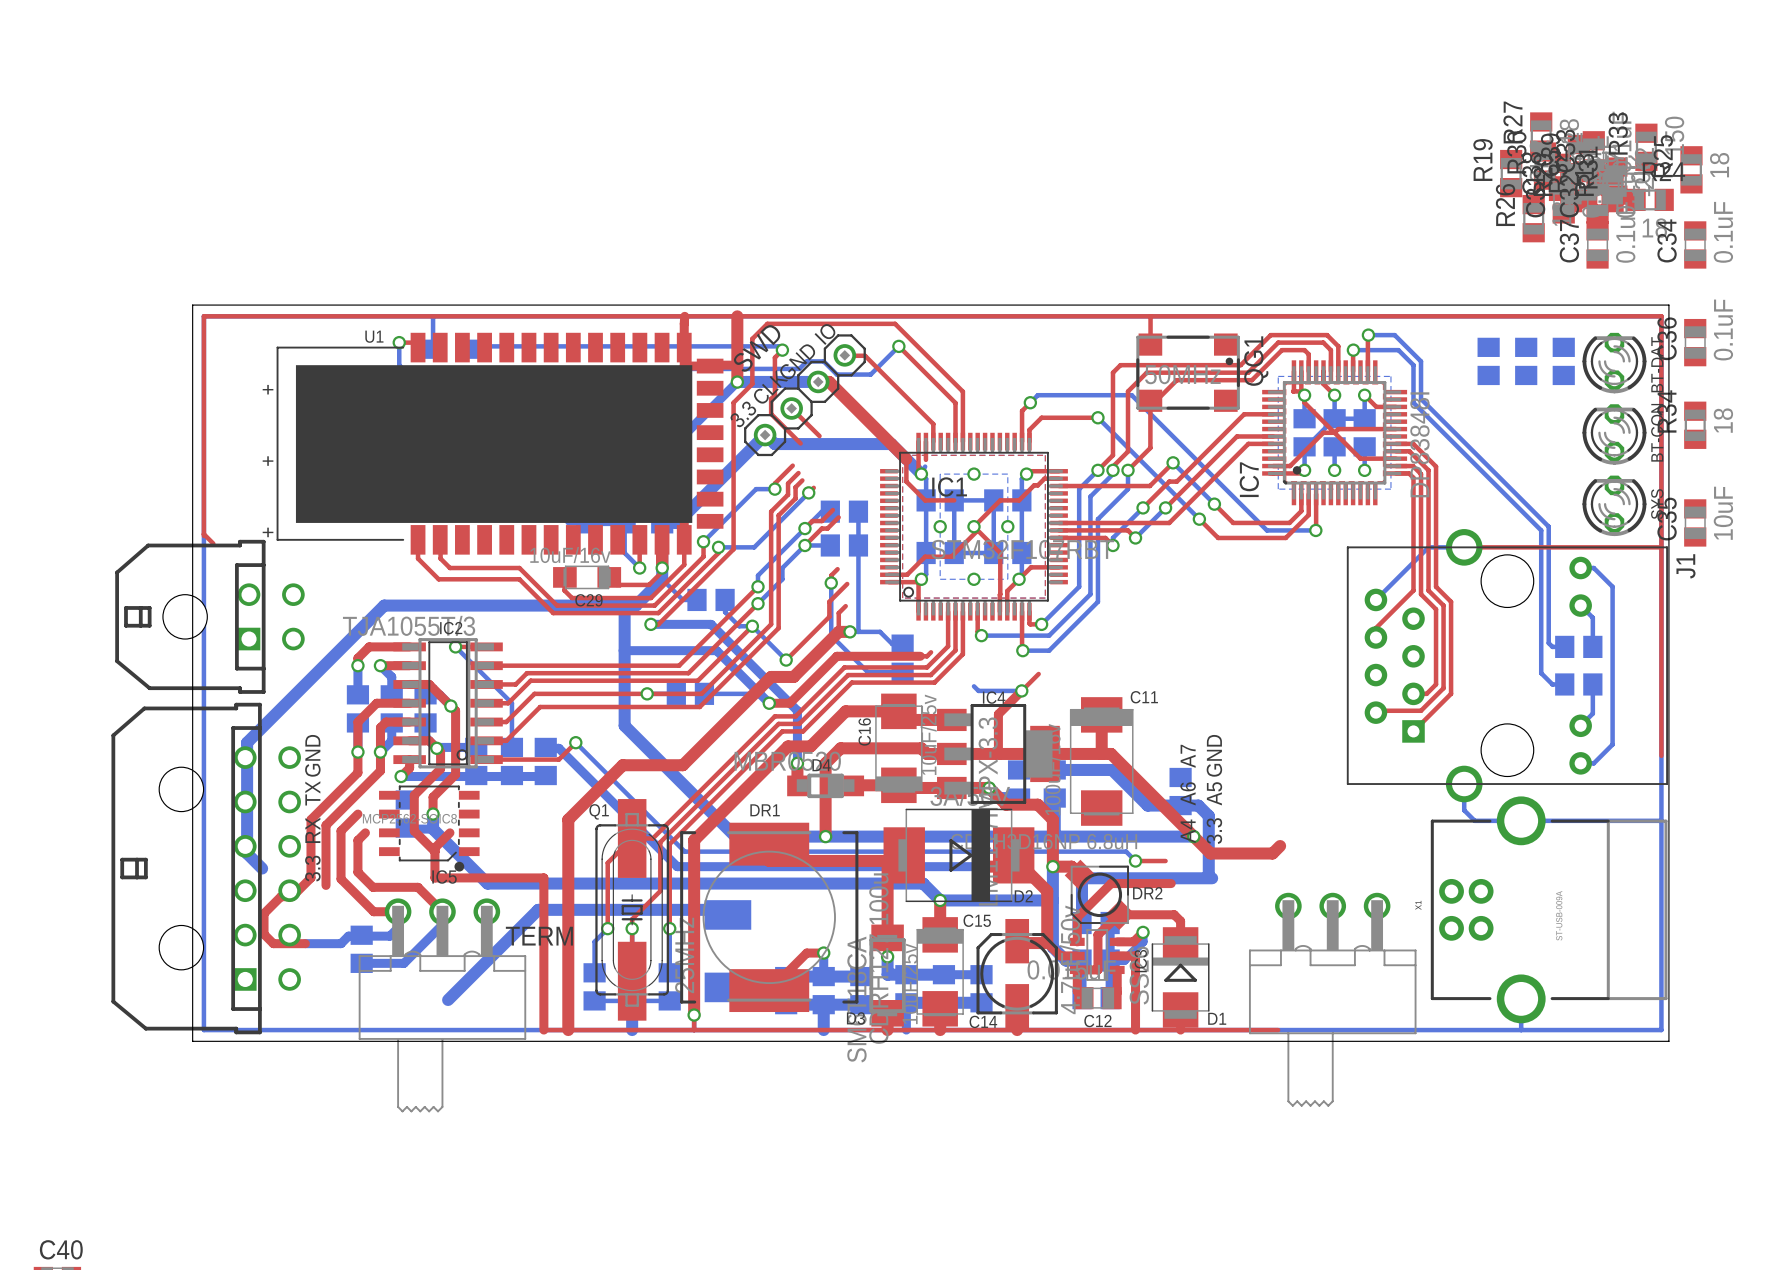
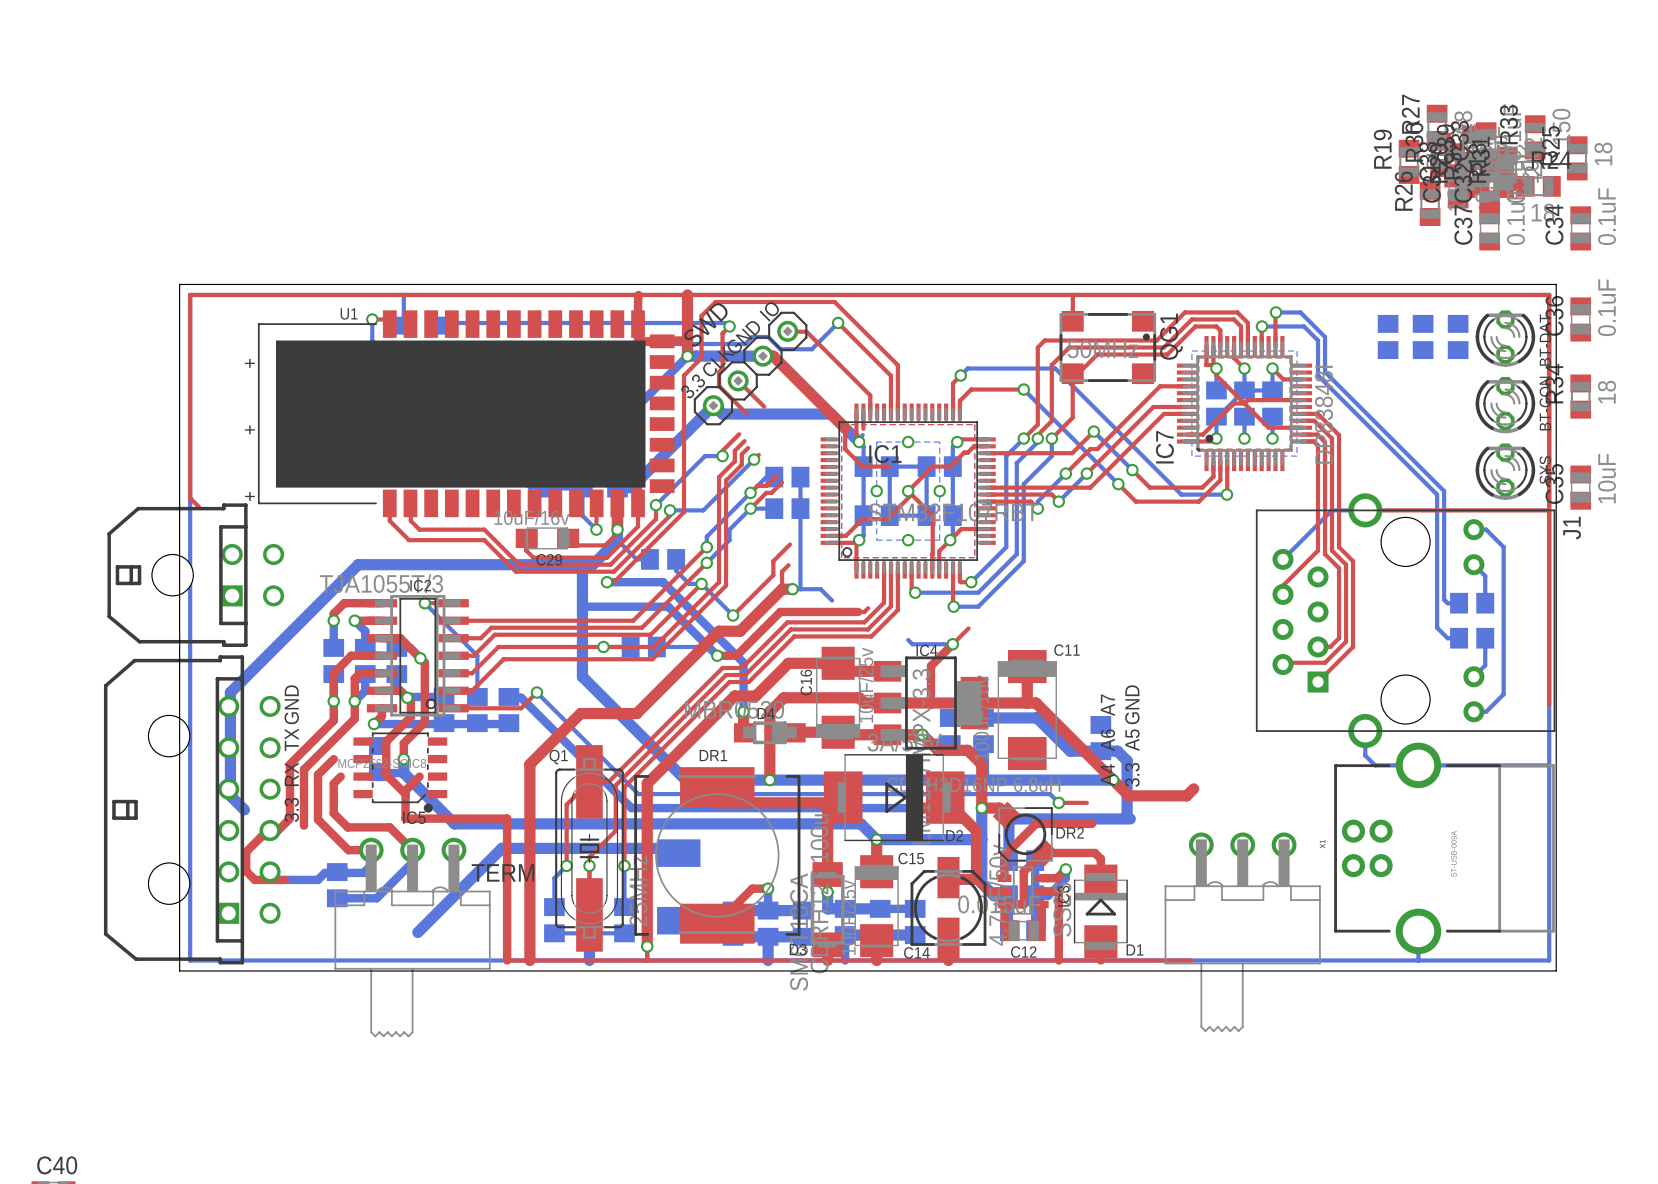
top track: (837, 569) (831, 575) (831, 583) -> none
bottom track: (831, 583) (831, 635) (867, 672) (902, 672) -> none
via: (831, 583) -> none
part: (902, 658) -> none

